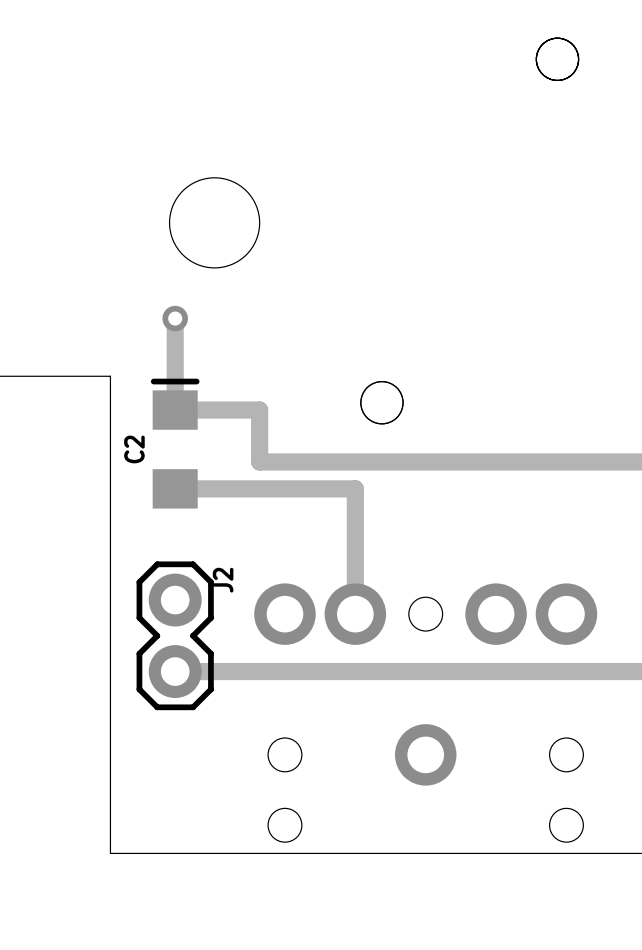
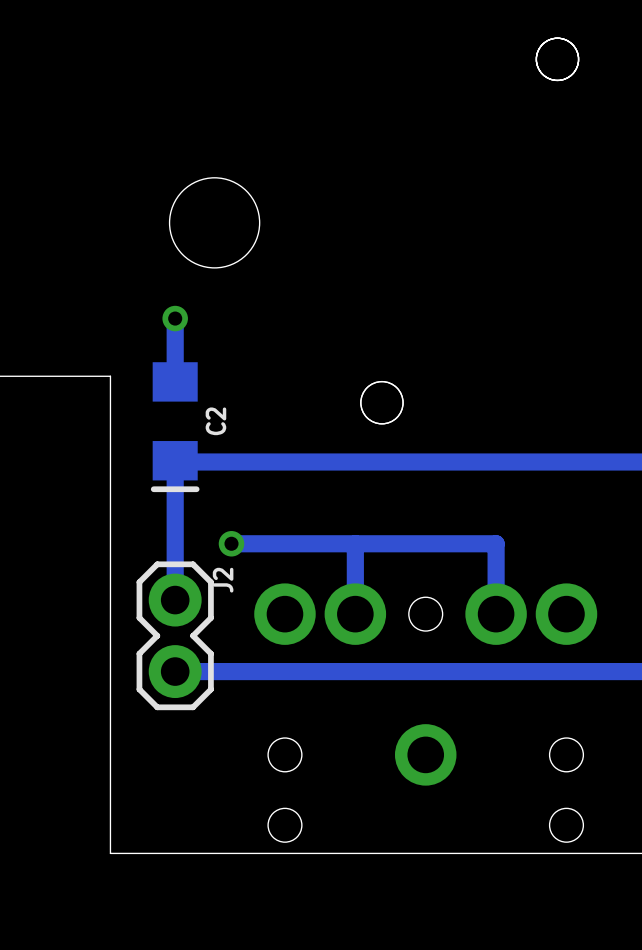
track: (175, 381) (175, 410) (259, 410) (259, 461) -> (175, 461) (259, 461)
C2 rotation: 0° (175, 443) -> 180° (175, 427)
track: none -> (175, 460) (175, 600)
track: (175, 488) (355, 488) (355, 543) -> none
track: none -> (231, 543) (496, 543) (496, 614)
via: none -> (231, 543)

